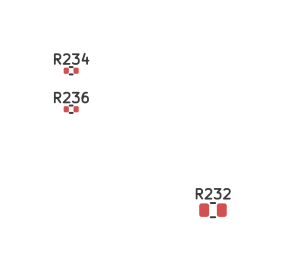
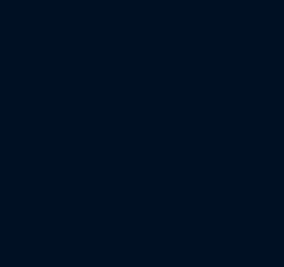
R234: (71, 70) -> none
R236: (71, 109) -> none
R232: (212, 210) -> none

